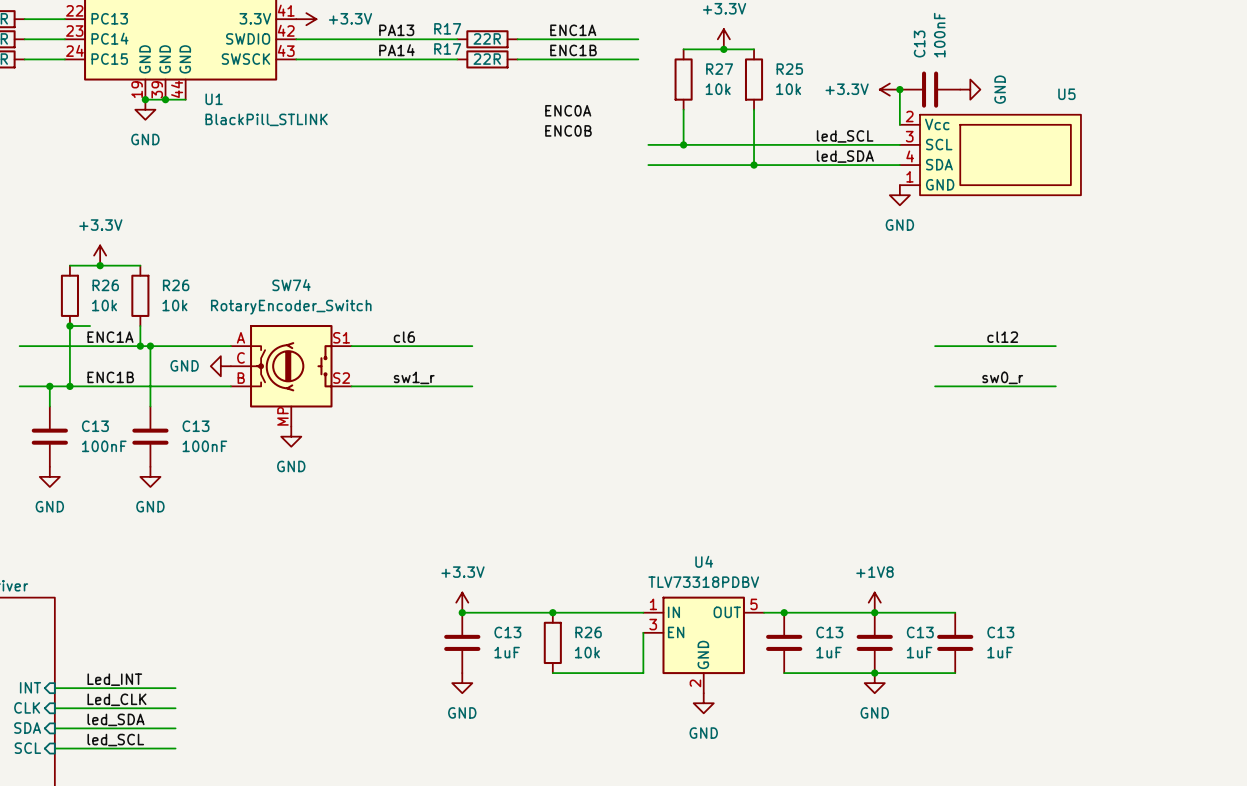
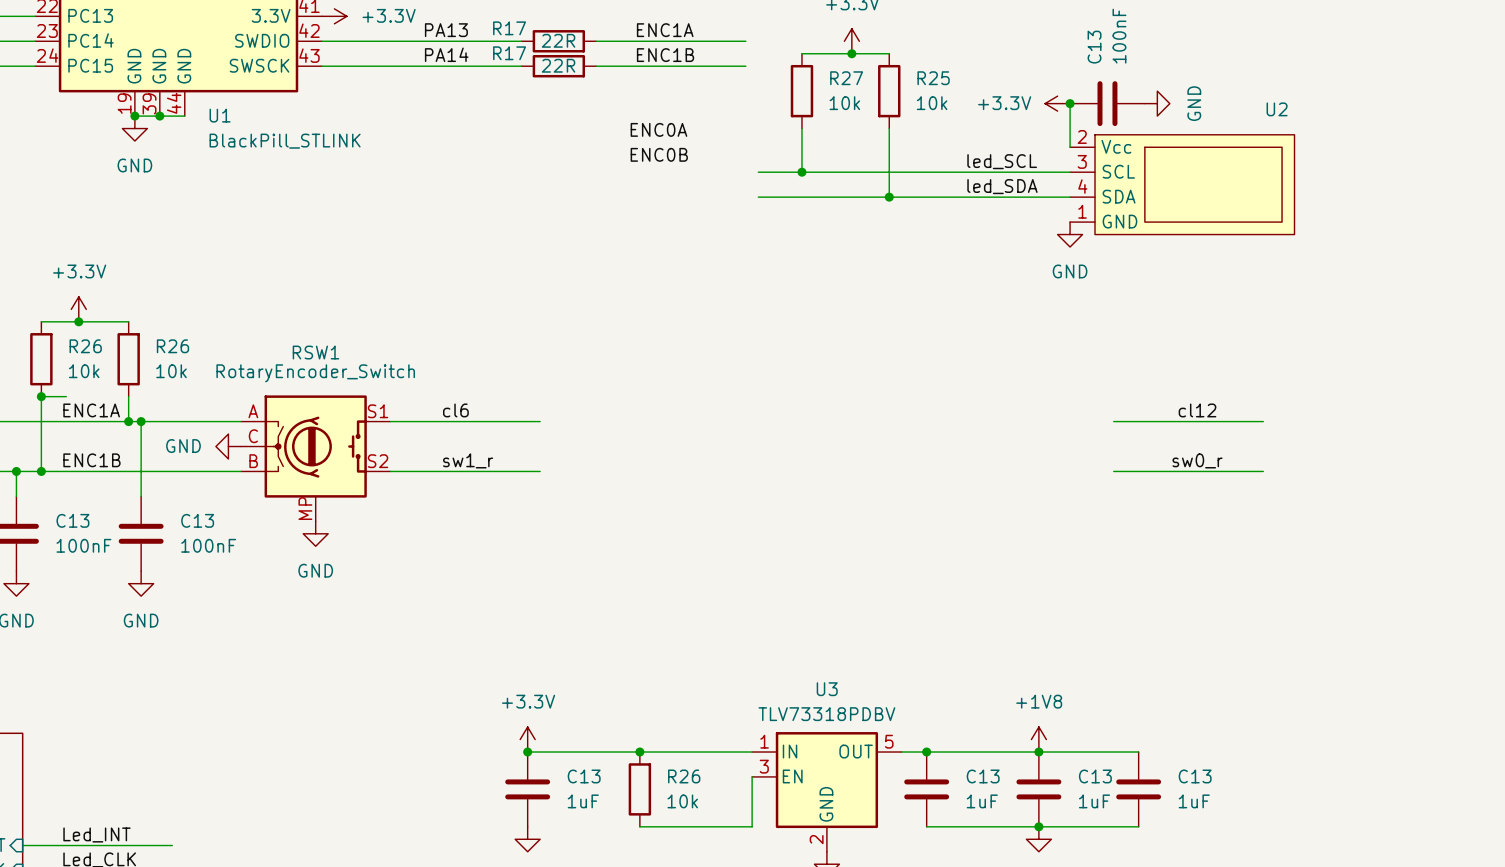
U5 name: U5 (1066, 94) -> U2 (1277, 109)
SW74 name: SW74 (291, 285) -> RSW1 (315, 352)
U4 name: U4 (704, 561) -> U3 (827, 689)

